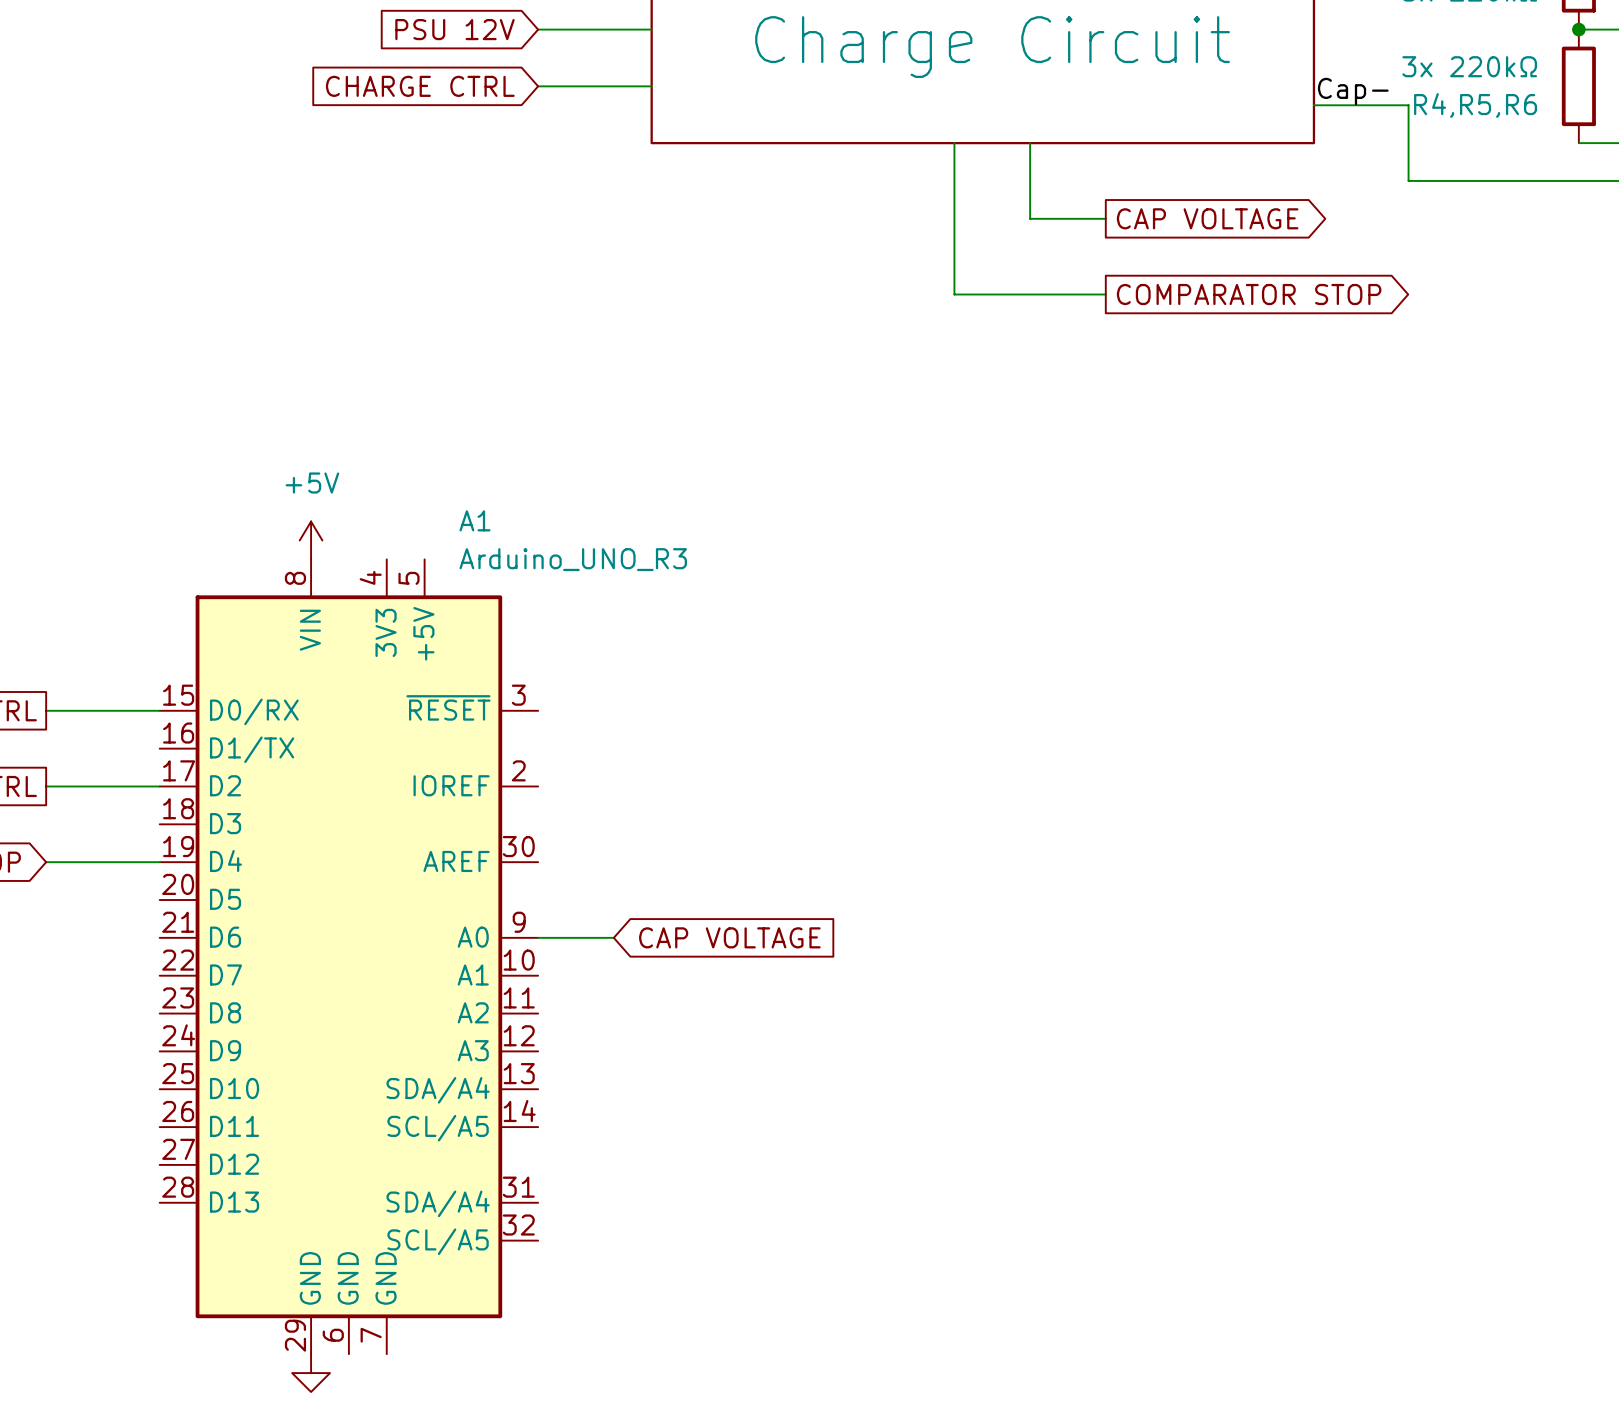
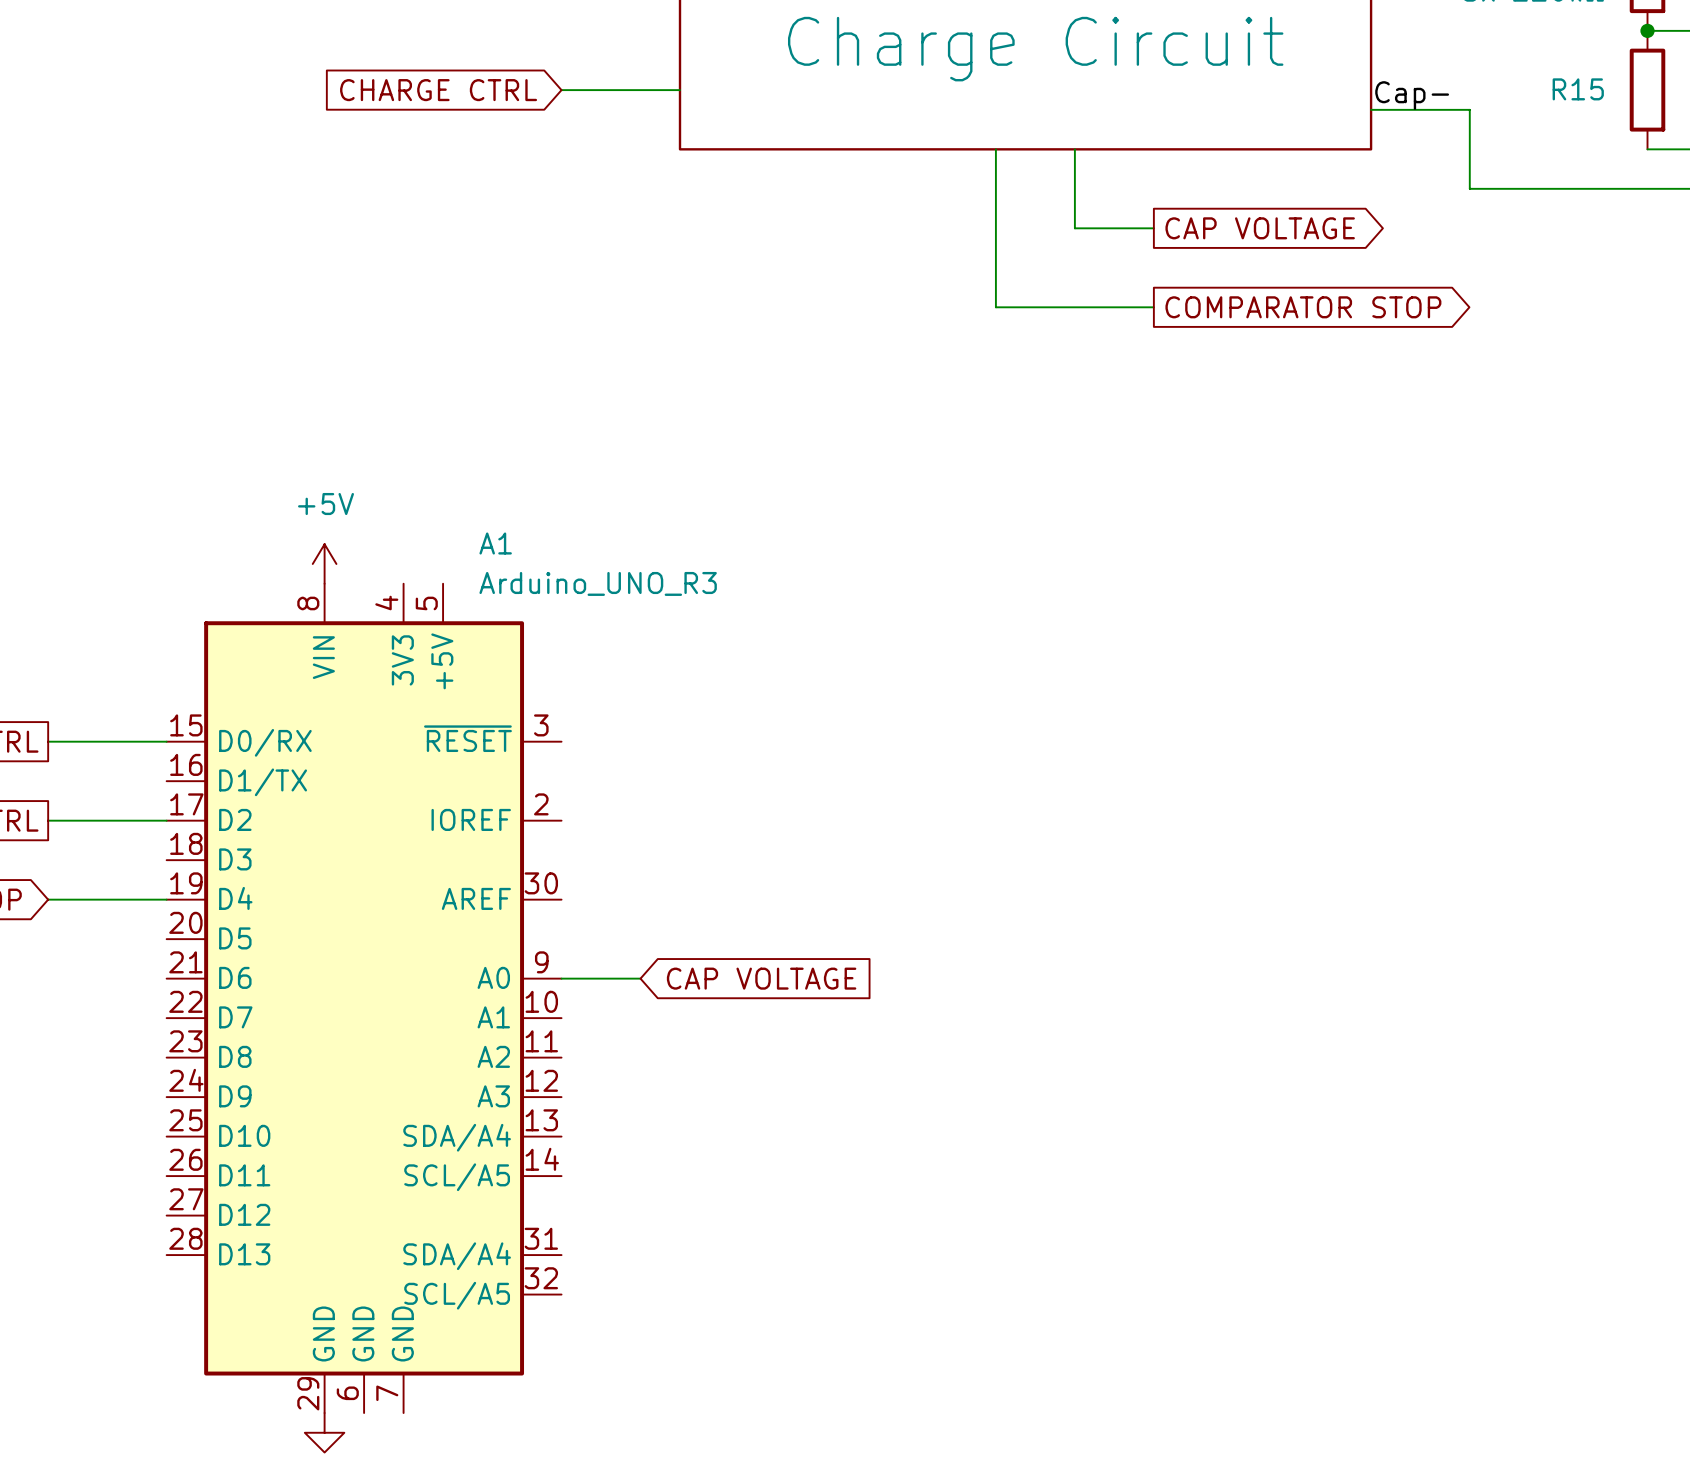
global label: PSU 12V (454, 29) -> none
wire: (538, 29) (651, 29) -> none
R4,R5,R6 value: 3x 220kΩ (1469, 66) -> none
R4,R5,R6 name: R4,R5,R6 (1475, 105) -> R15 (1578, 89)

